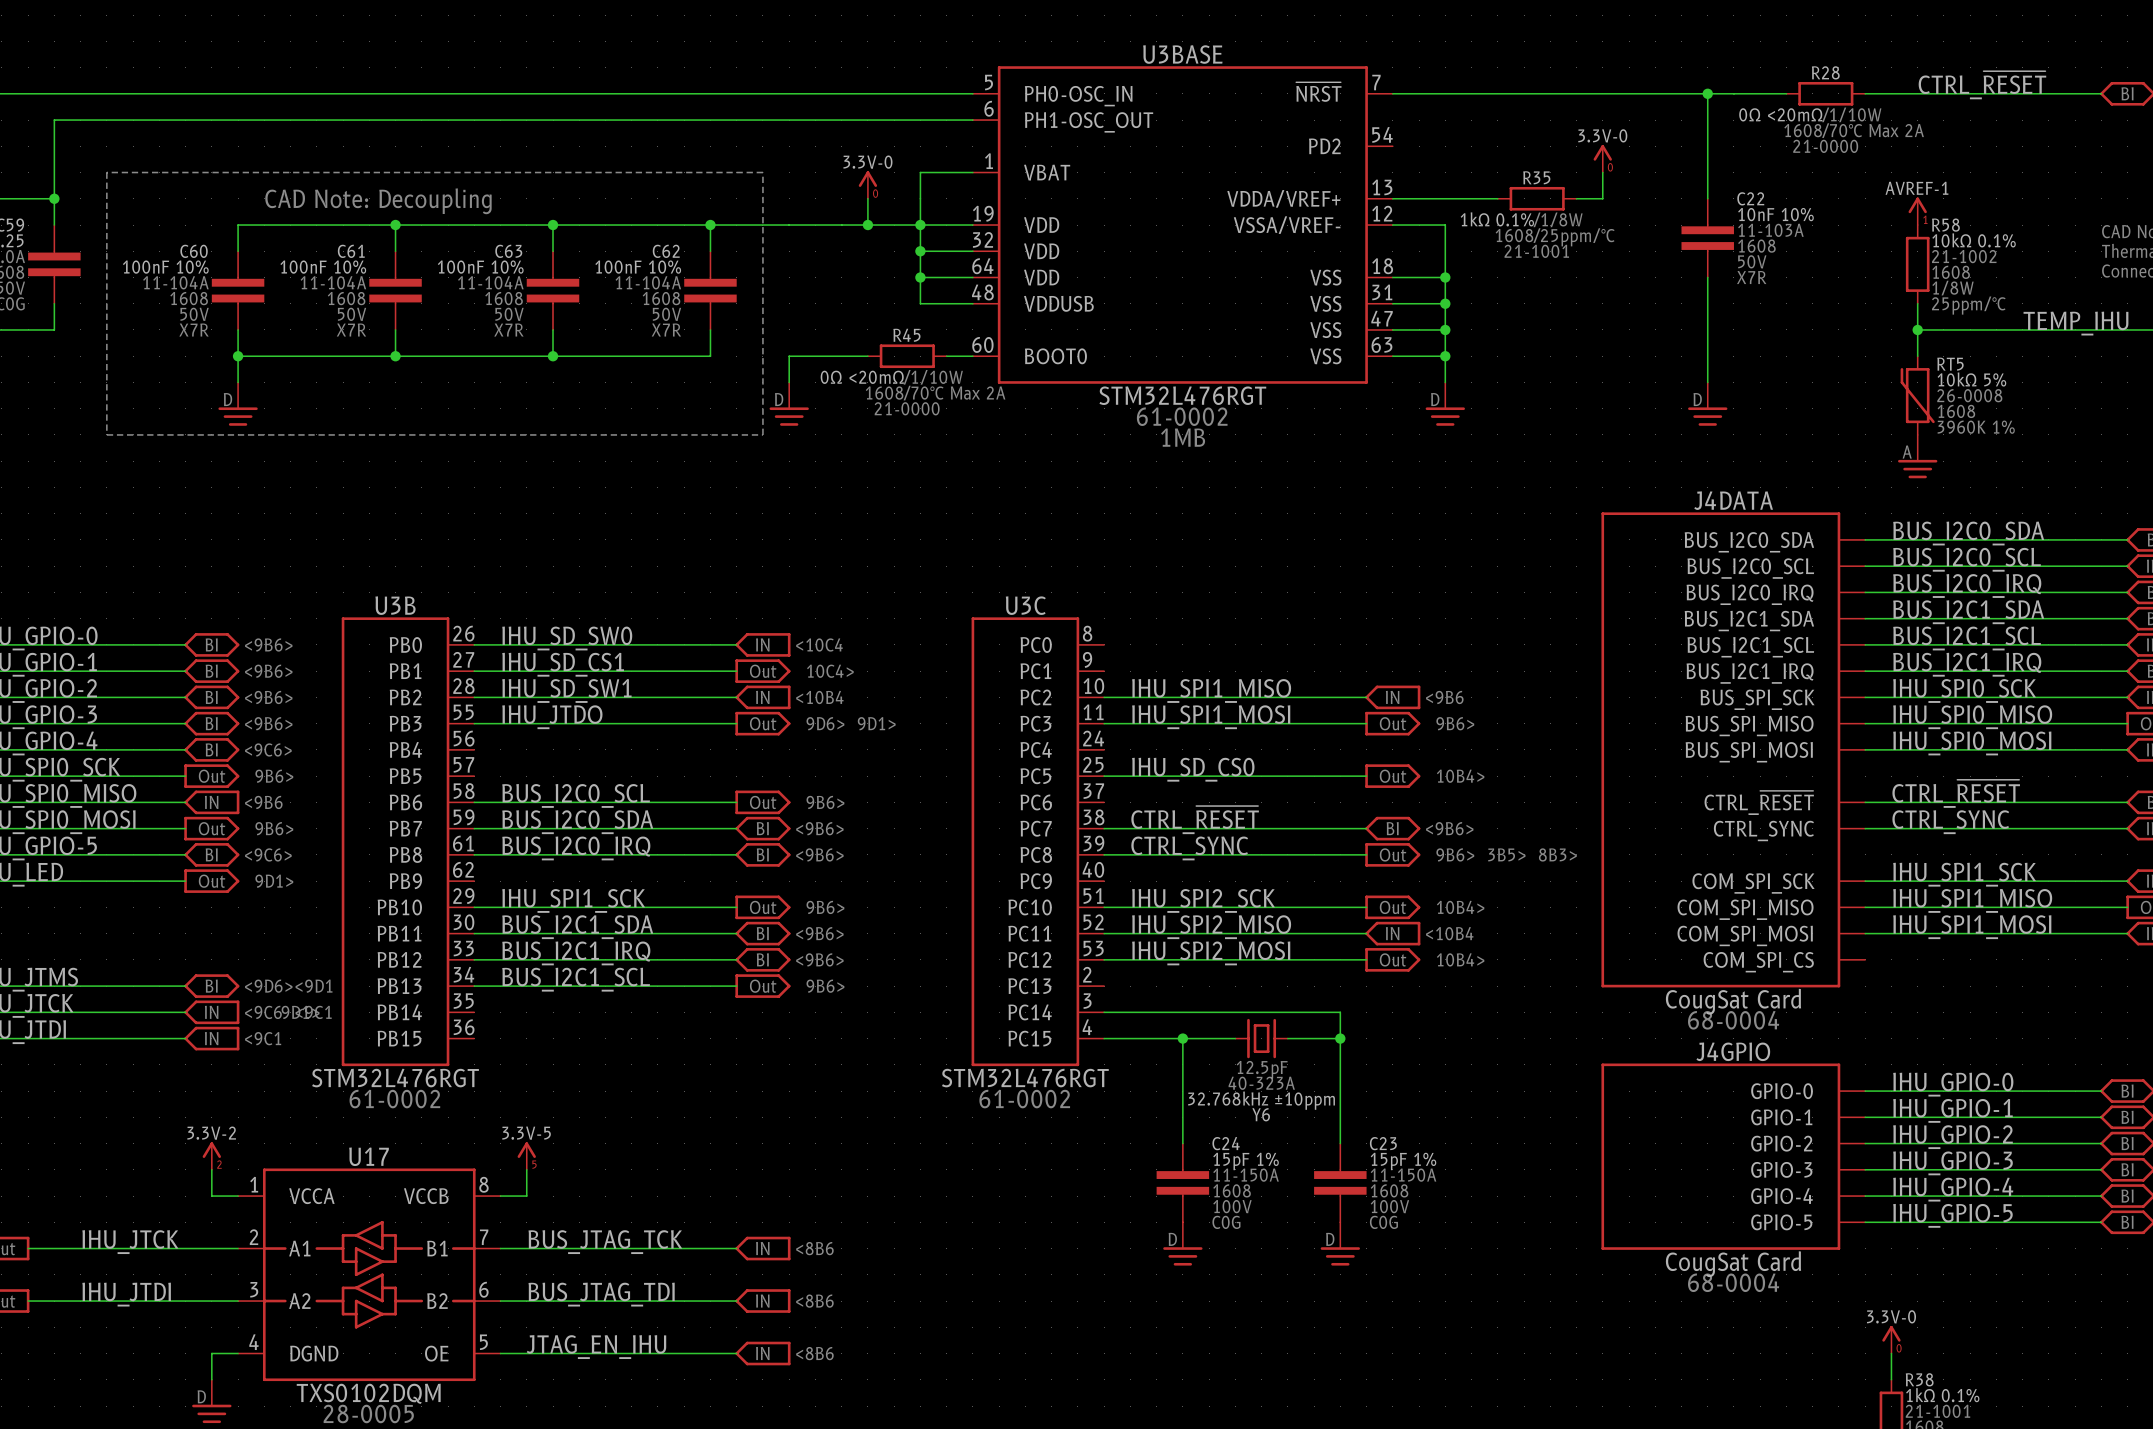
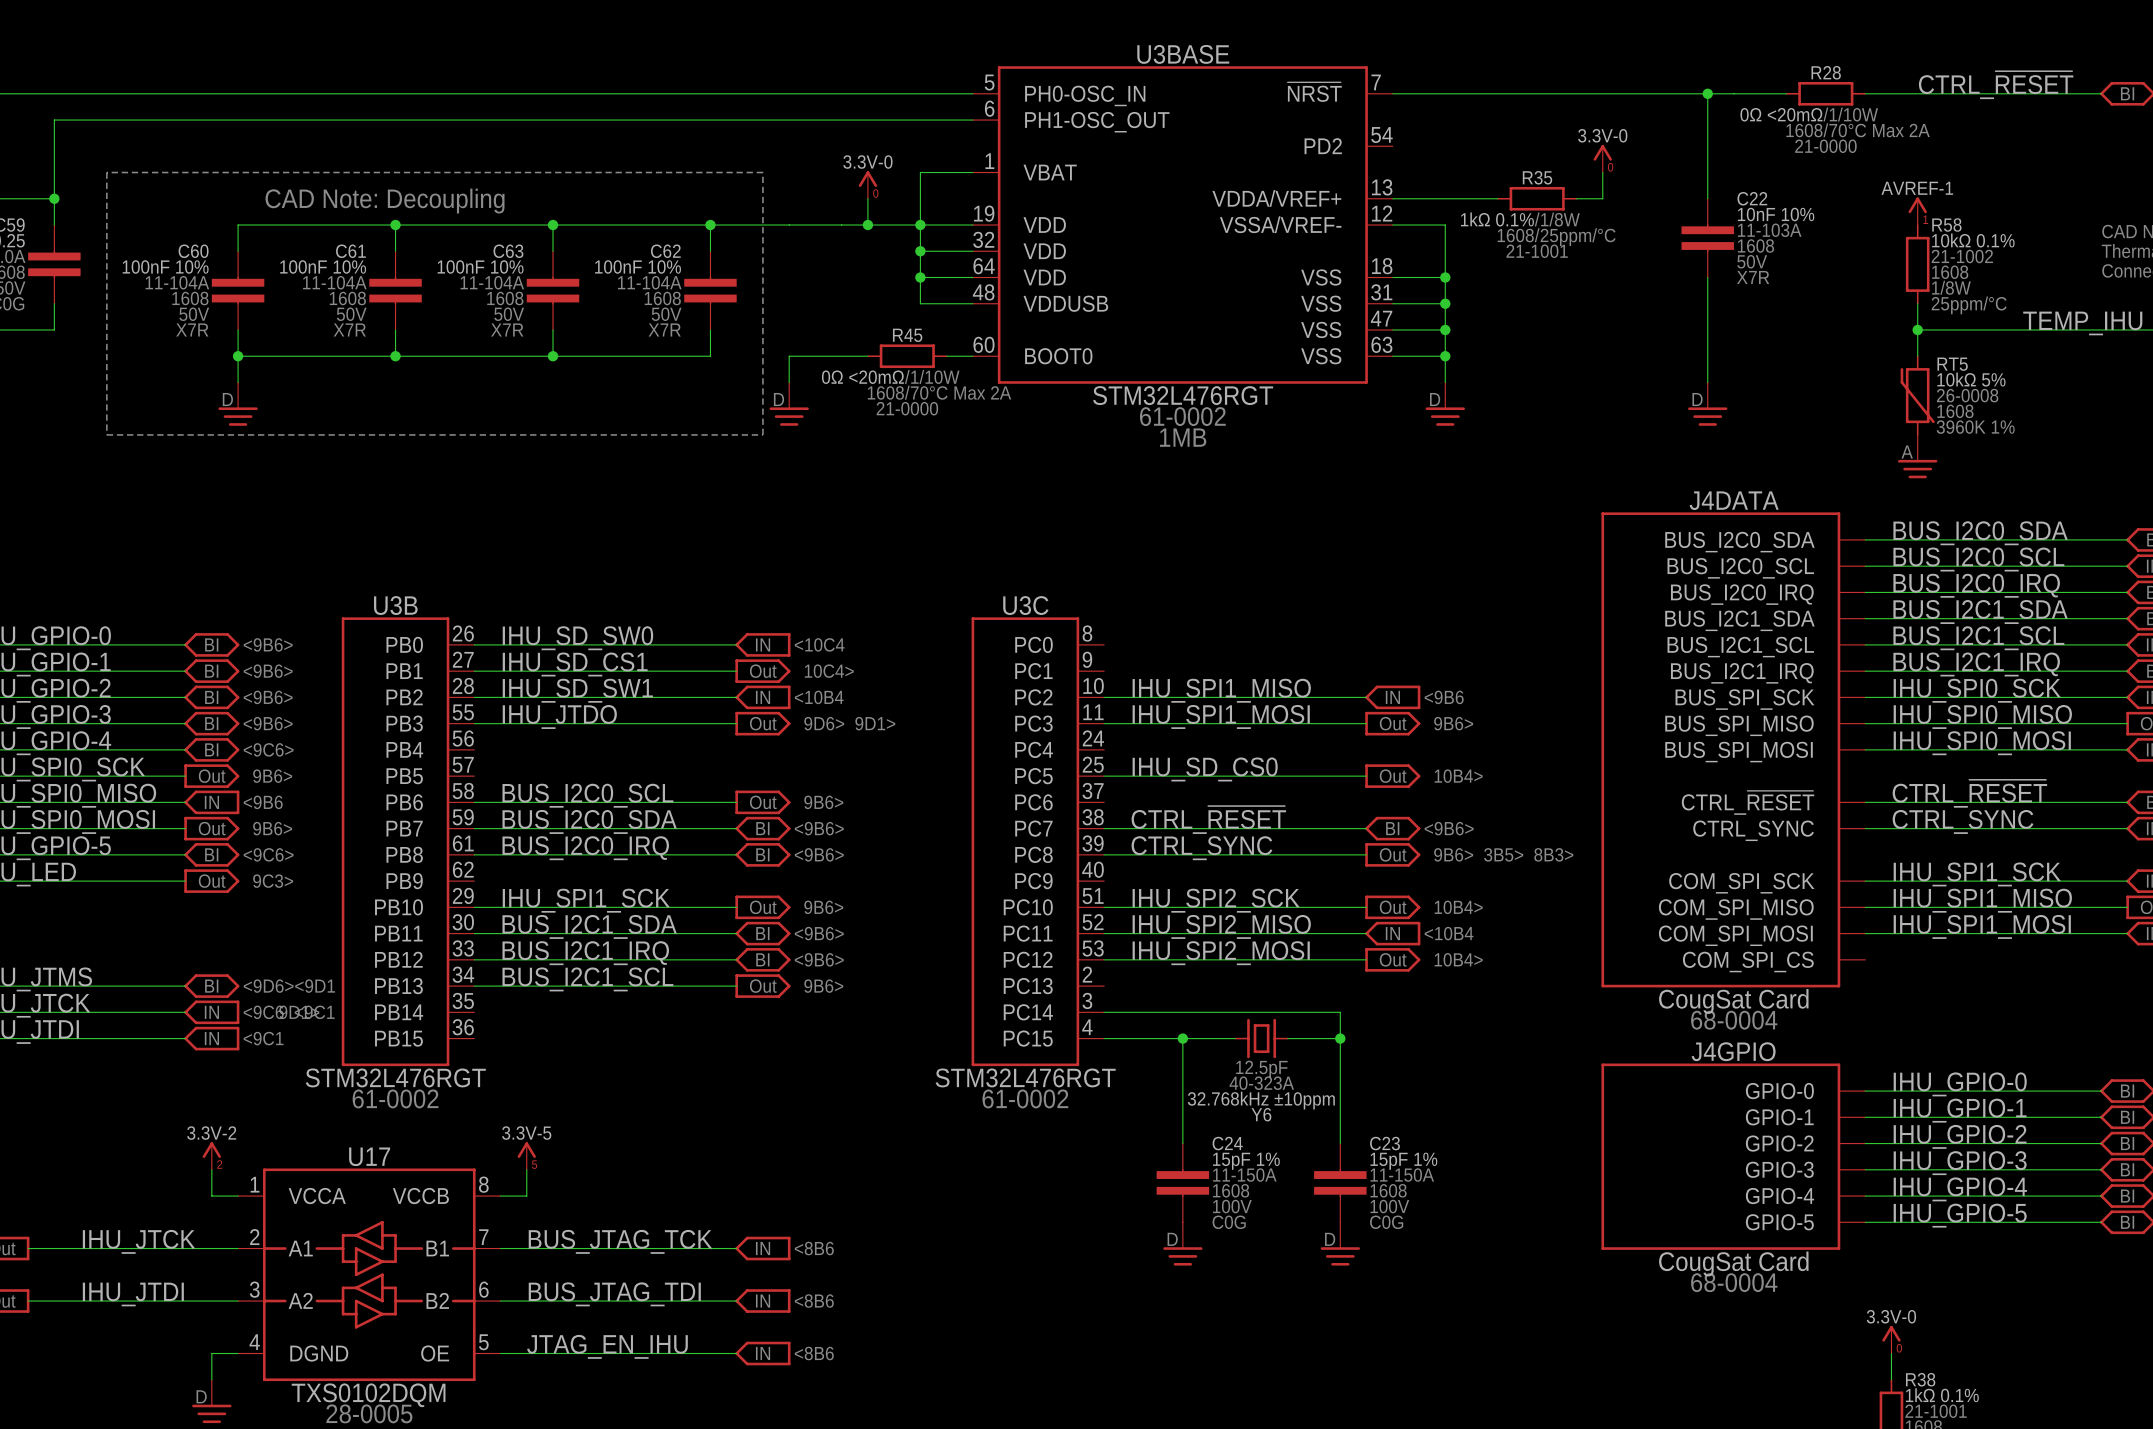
text: 9D1> (274, 881) -> 9C3> (273, 881)

